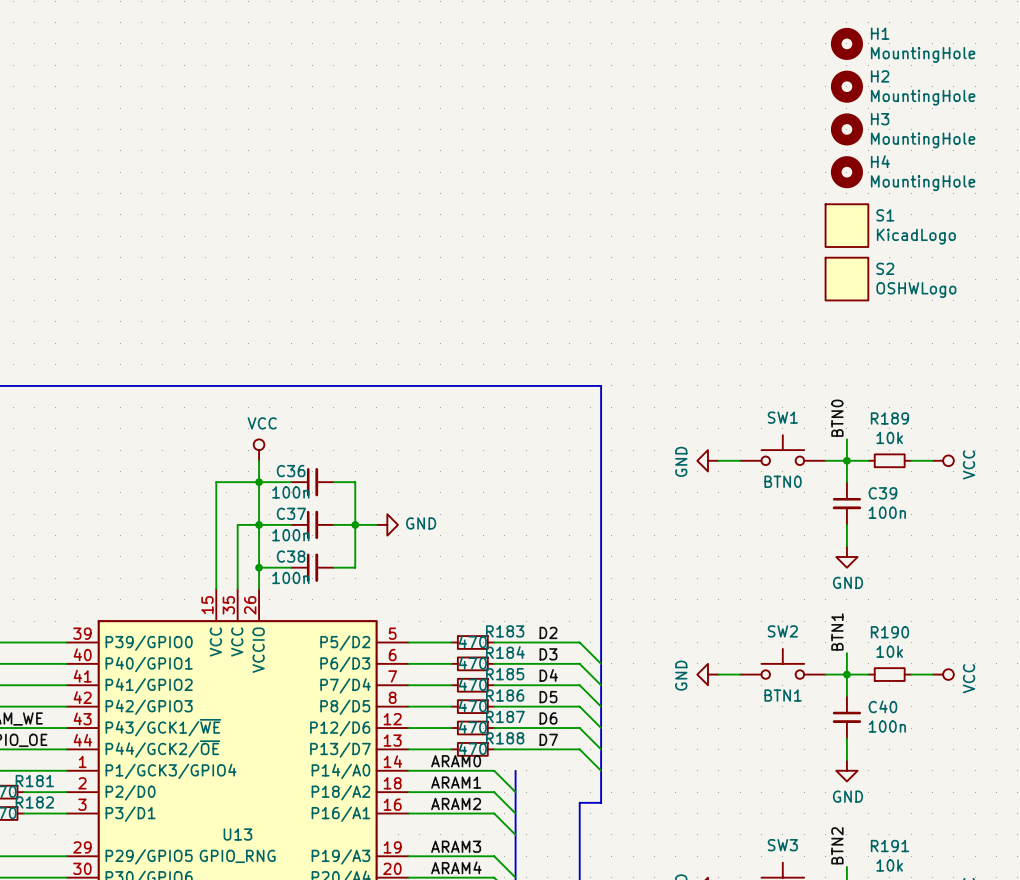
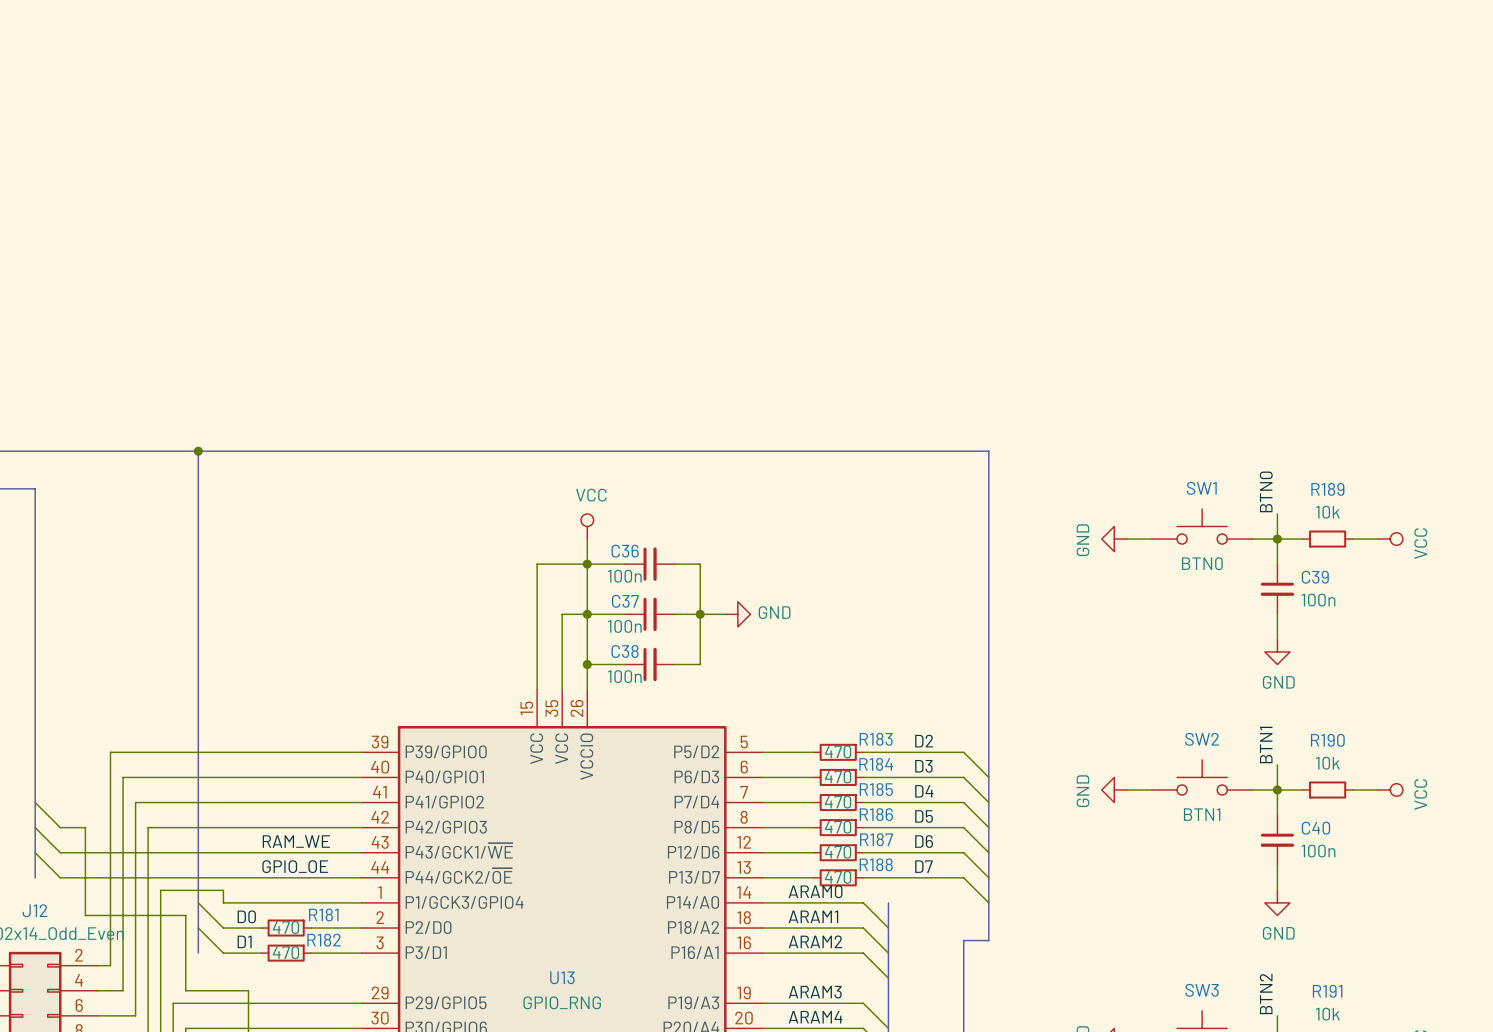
H1: MountingHole (846, 43) -> none
H2: MountingHole (846, 86) -> none
H3: MountingHole (846, 129) -> none
H4: MountingHole (846, 172) -> none
S1: KicadLogo (846, 225) -> none
S2: OSHWLogo (846, 279) -> none

